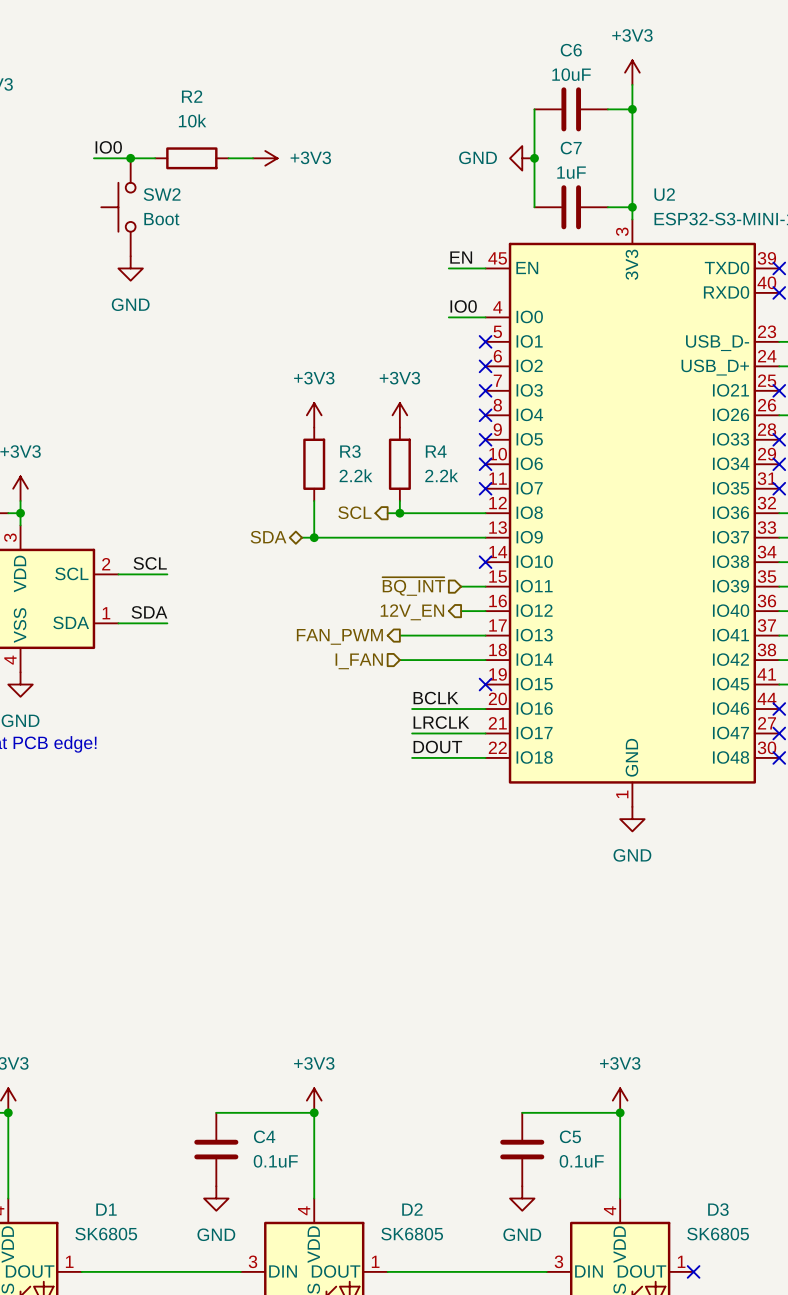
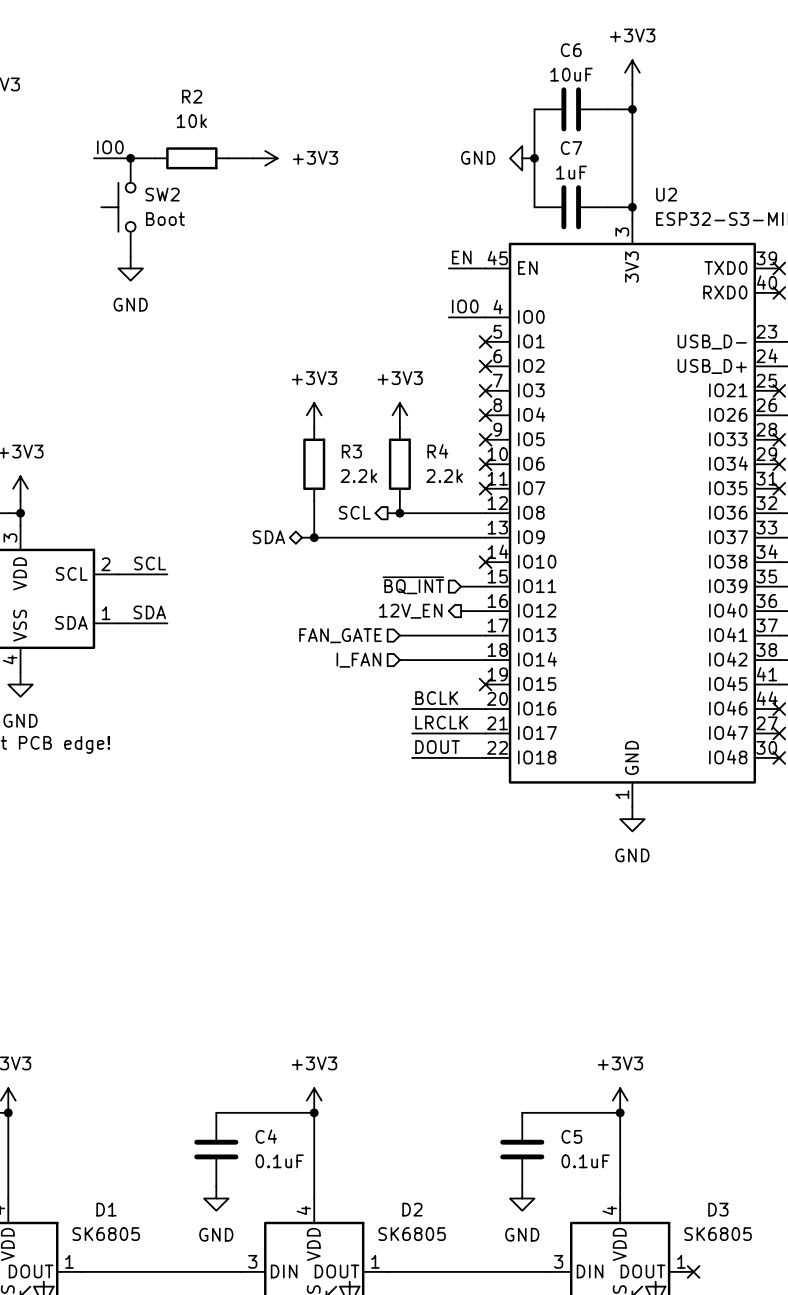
hierarchical label shape: output (339, 636) -> input (340, 635)
hierarchical label: FAN_PWM (339, 636) -> FAN_GATE (340, 635)

